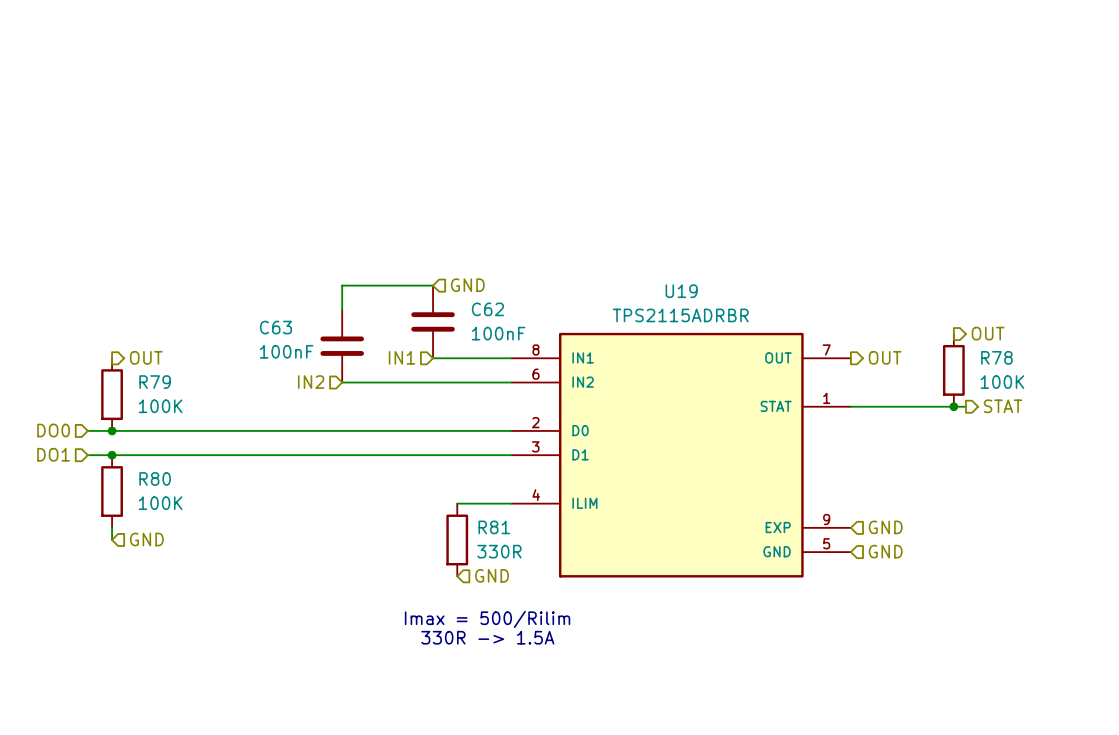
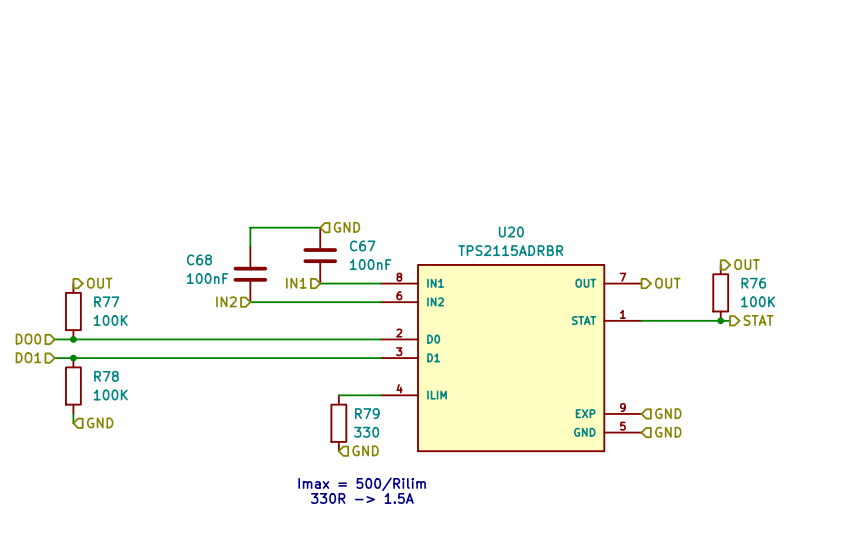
U19 name: U19 (681, 291) -> U20 (511, 231)
C62 name: C62 (487, 309) -> C67 (362, 245)
C63 name: C63 (275, 327) -> C68 (199, 259)
R78 name: R78 (996, 357) -> R76 (753, 283)
R79 name: R79 (155, 382) -> R77 (106, 301)
R80 name: R80 (155, 478) -> R78 (106, 376)
R81 name: R81 (494, 527) -> R79 (367, 413)
R81 value: 330R (499, 551) -> 330 (366, 432)

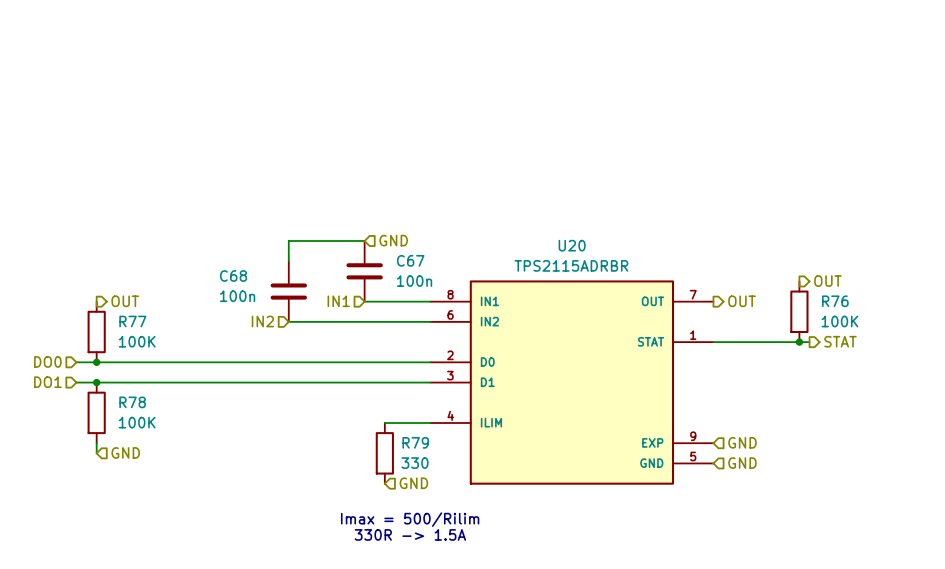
C67 value: 100nF (370, 264) -> 100n (414, 281)
C68 value: 100nF (207, 278) -> 100n (237, 296)

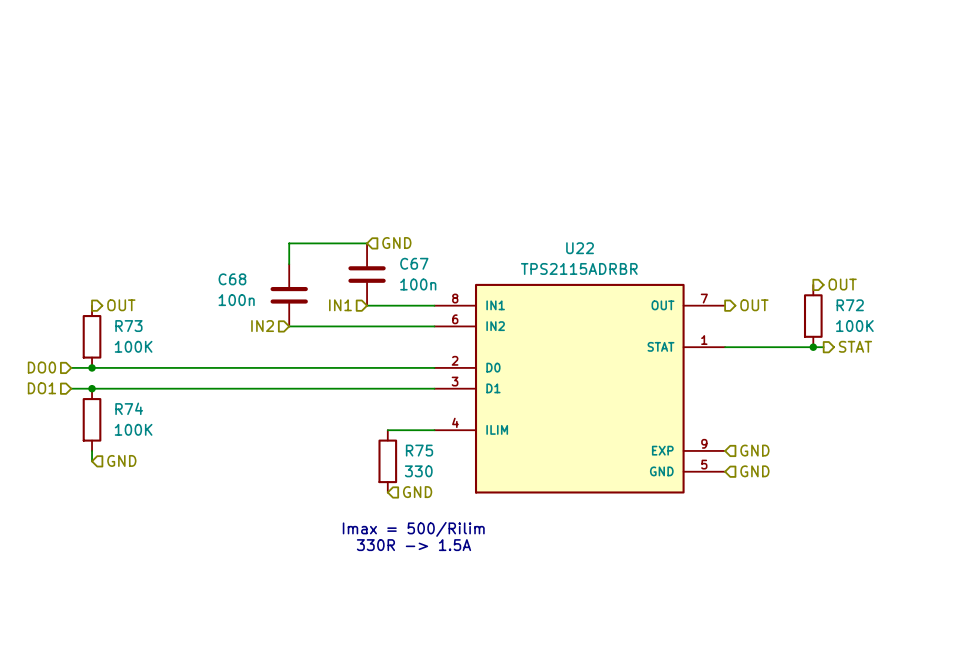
U20 name: U20 (572, 245) -> U22 (580, 248)
R76 name: R76 (835, 301) -> R72 (850, 305)
R77 name: R77 (132, 321) -> R73 (128, 326)
R78 name: R78 (132, 402) -> R74 (129, 408)
R79 name: R79 (415, 442) -> R75 (419, 450)

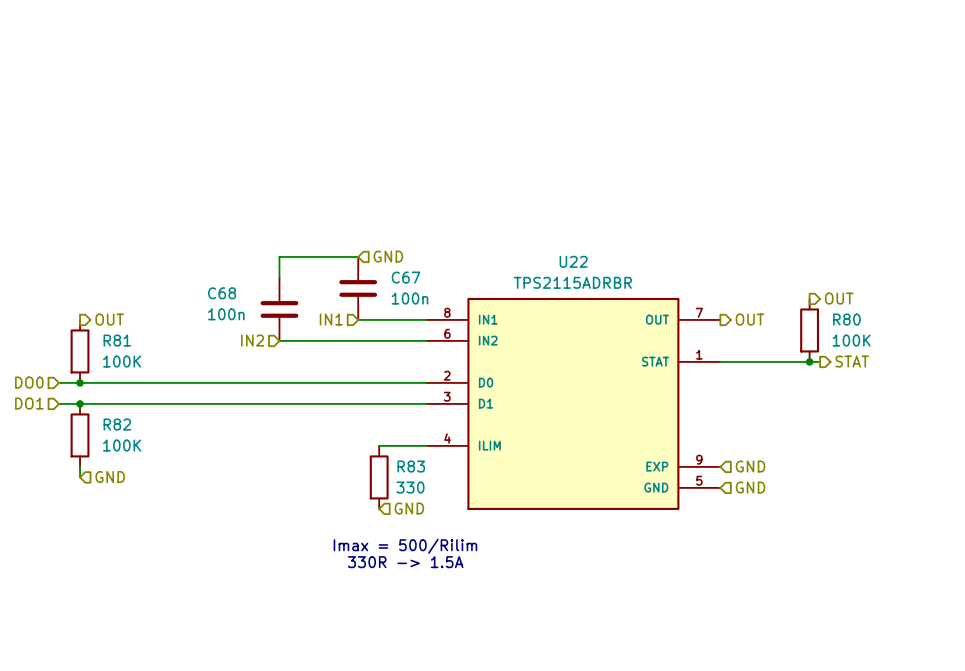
R72 name: R72 (850, 305) -> R80 (846, 319)
R73 name: R73 (128, 326) -> R81 (117, 340)
R74 name: R74 (129, 408) -> R82 (117, 424)
R75 name: R75 (419, 450) -> R83 (411, 466)

